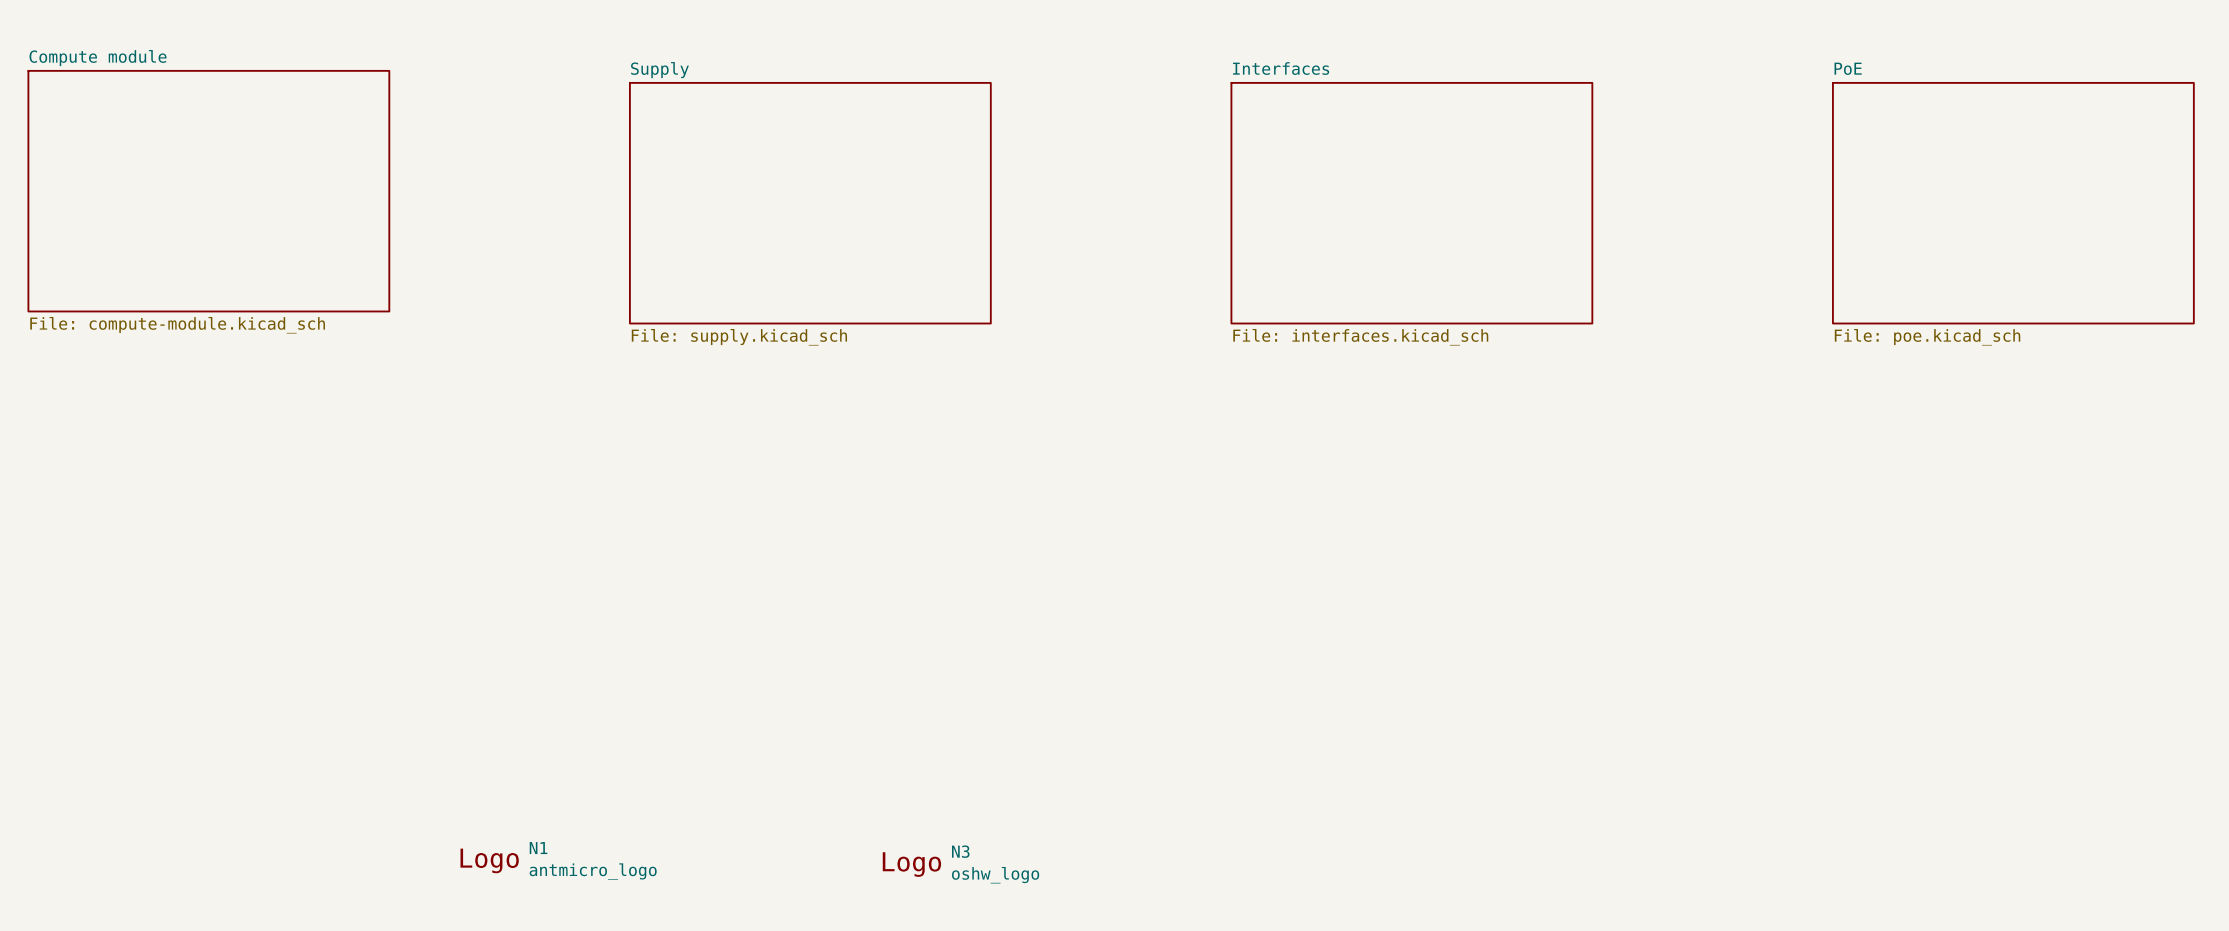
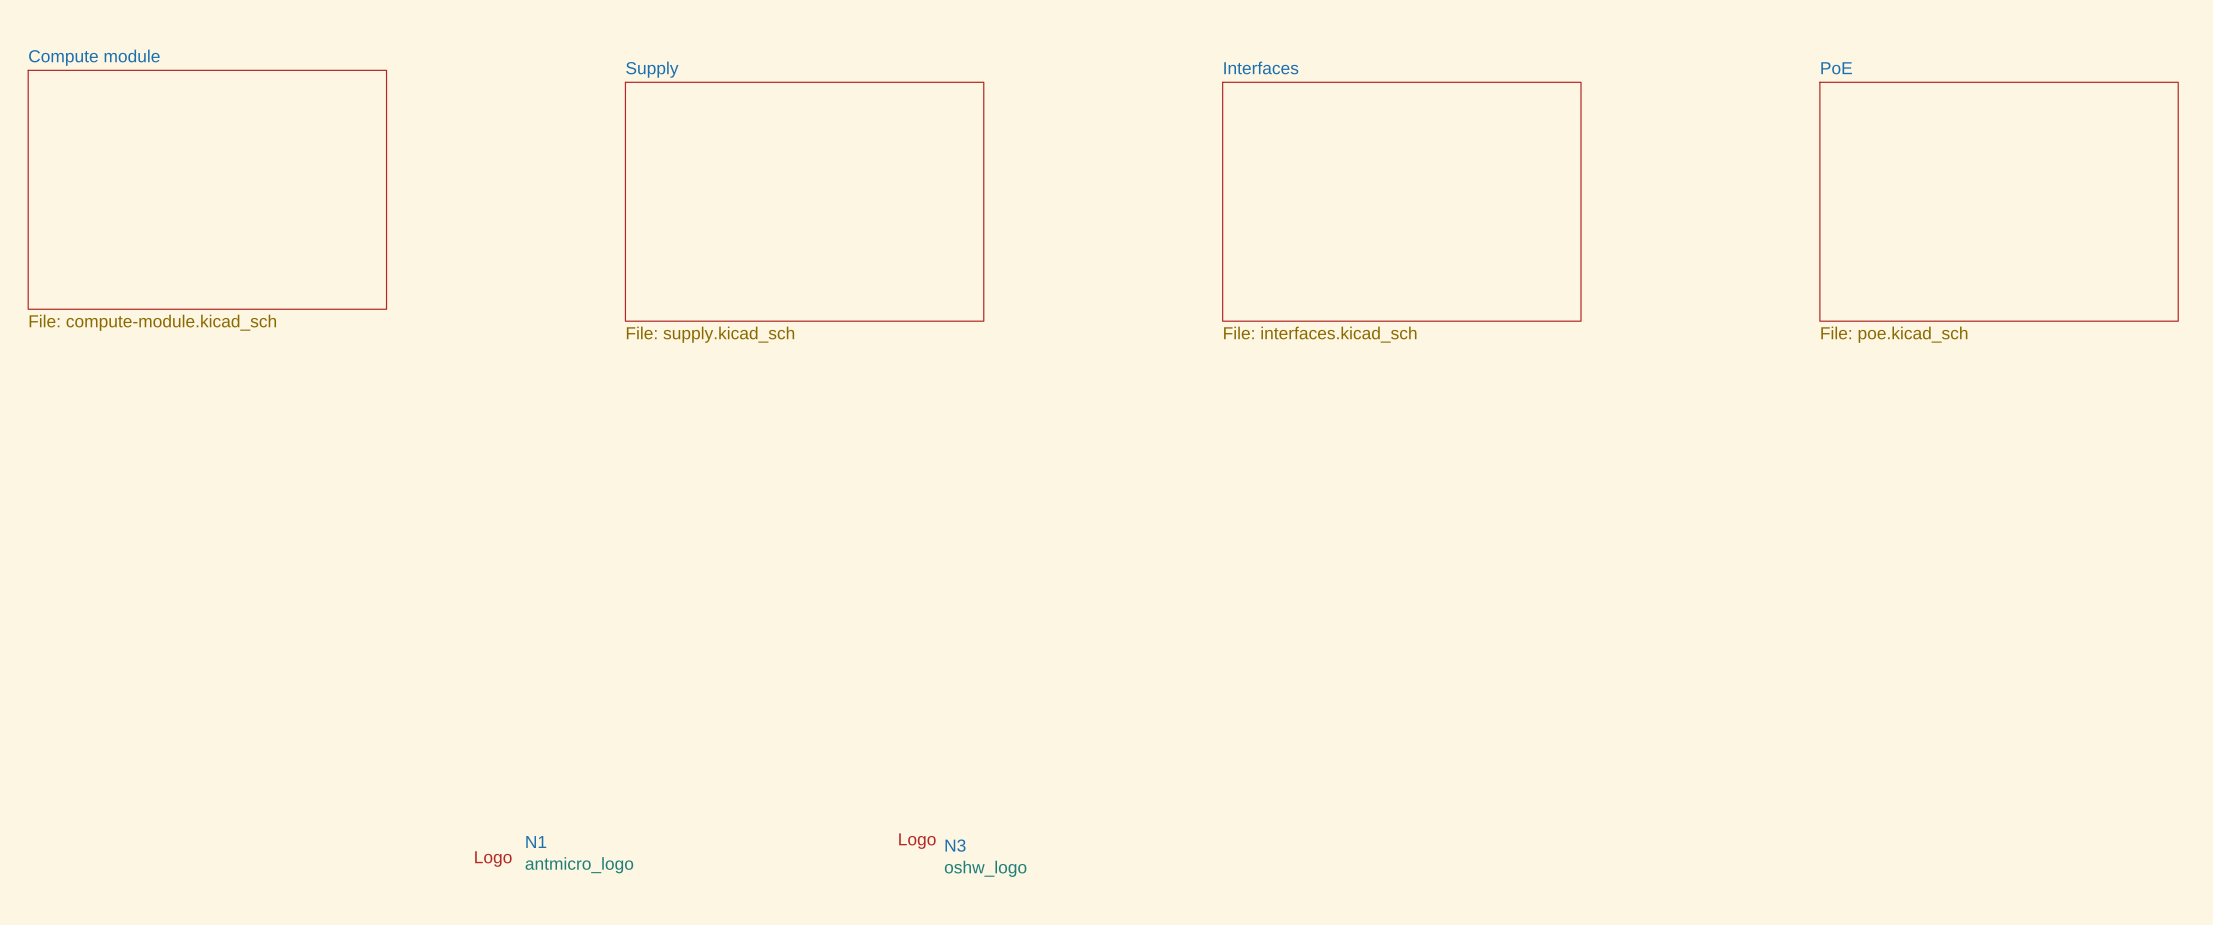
N1 symbol: [460, 842, 657, 880] -> [475, 836, 634, 874]
N3 symbol: [882, 845, 1040, 884] -> [899, 833, 1027, 877]

